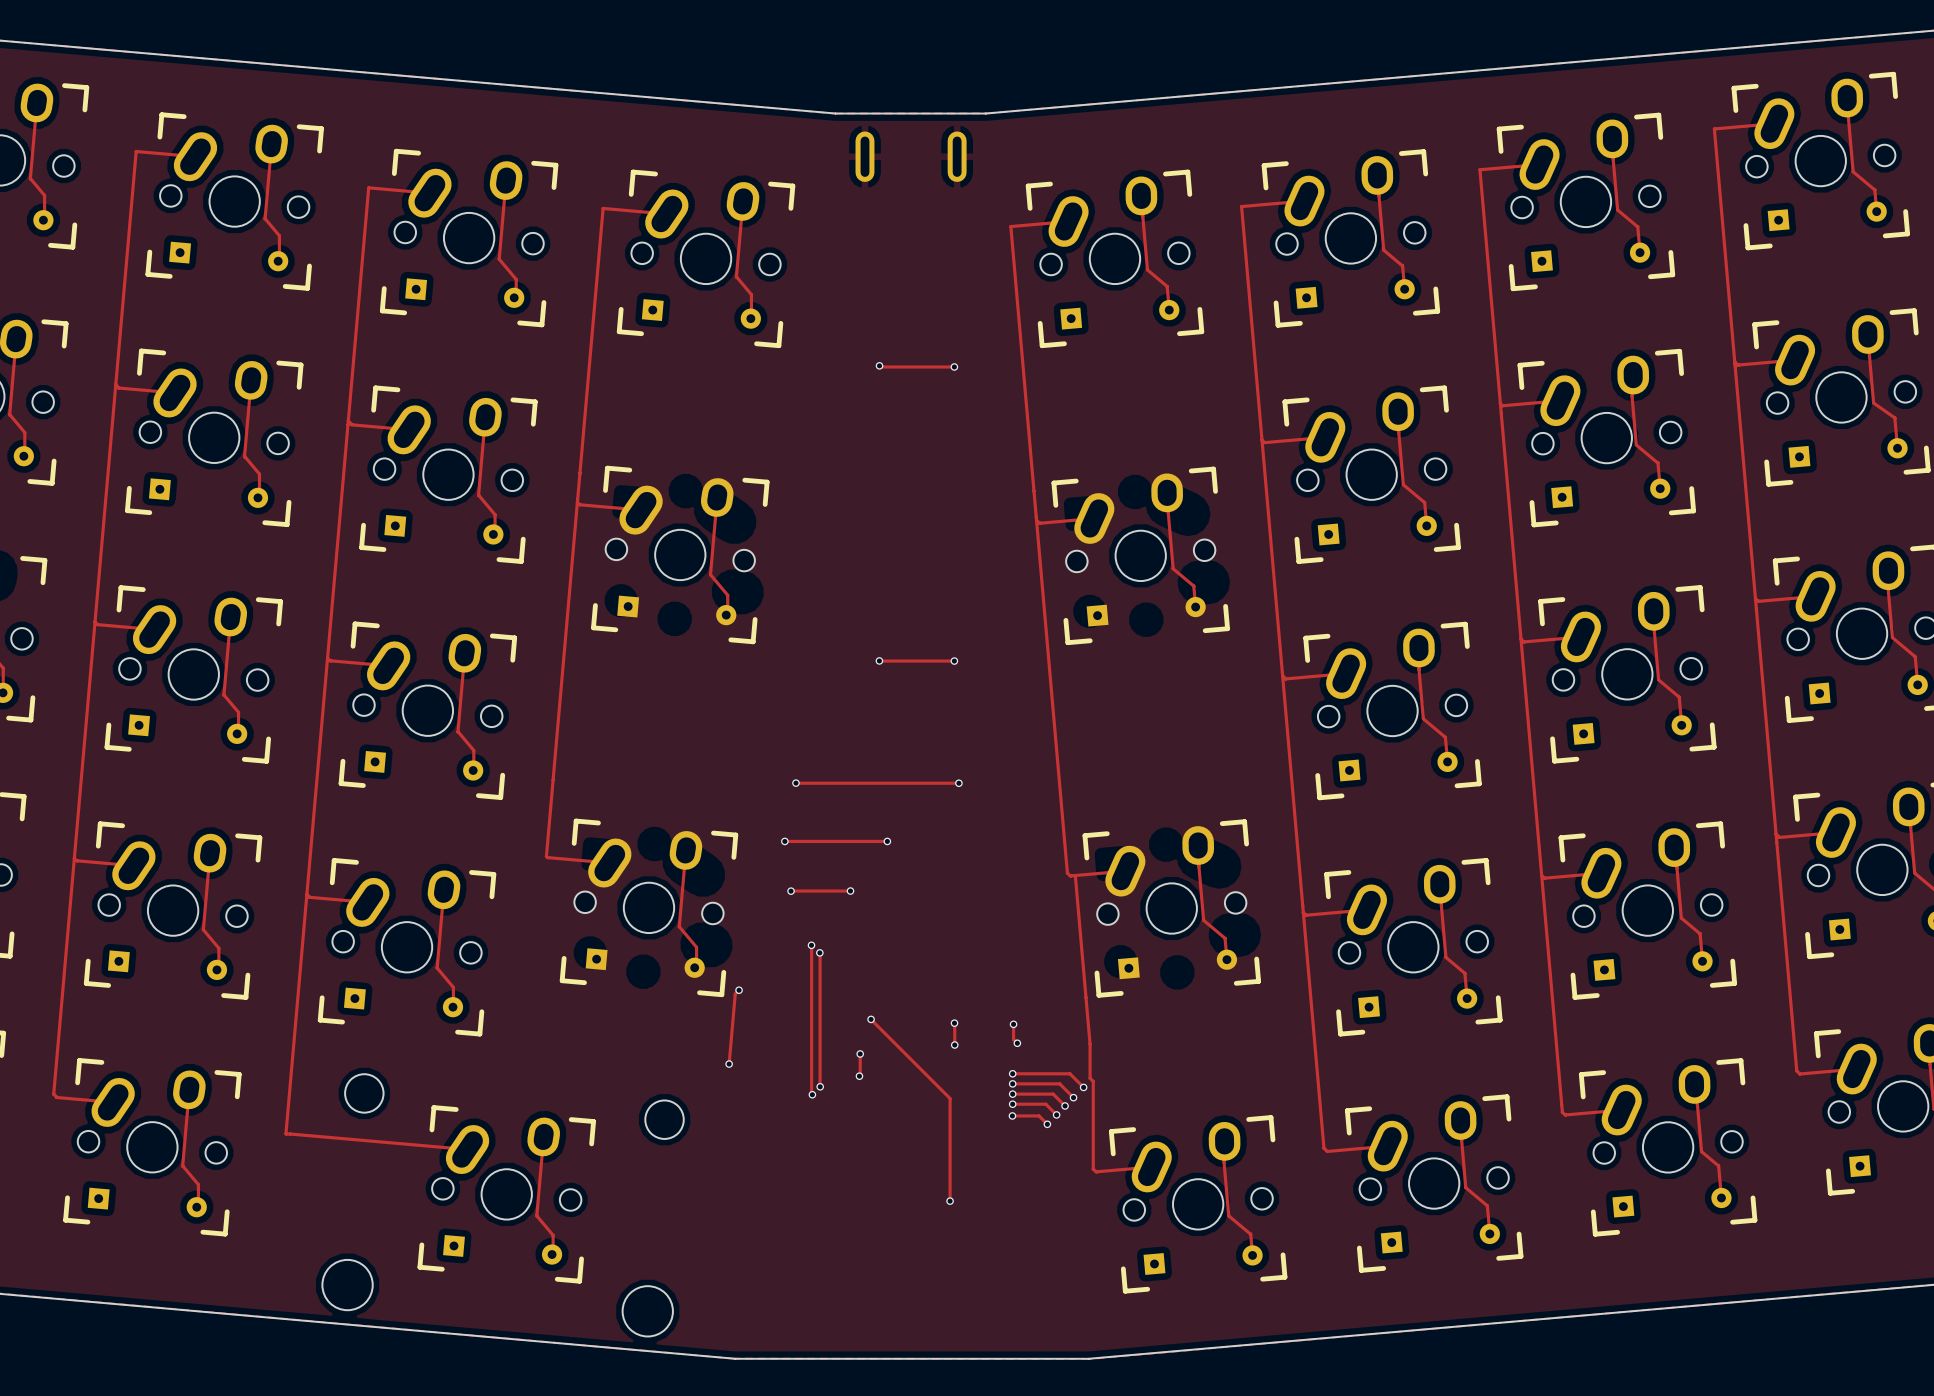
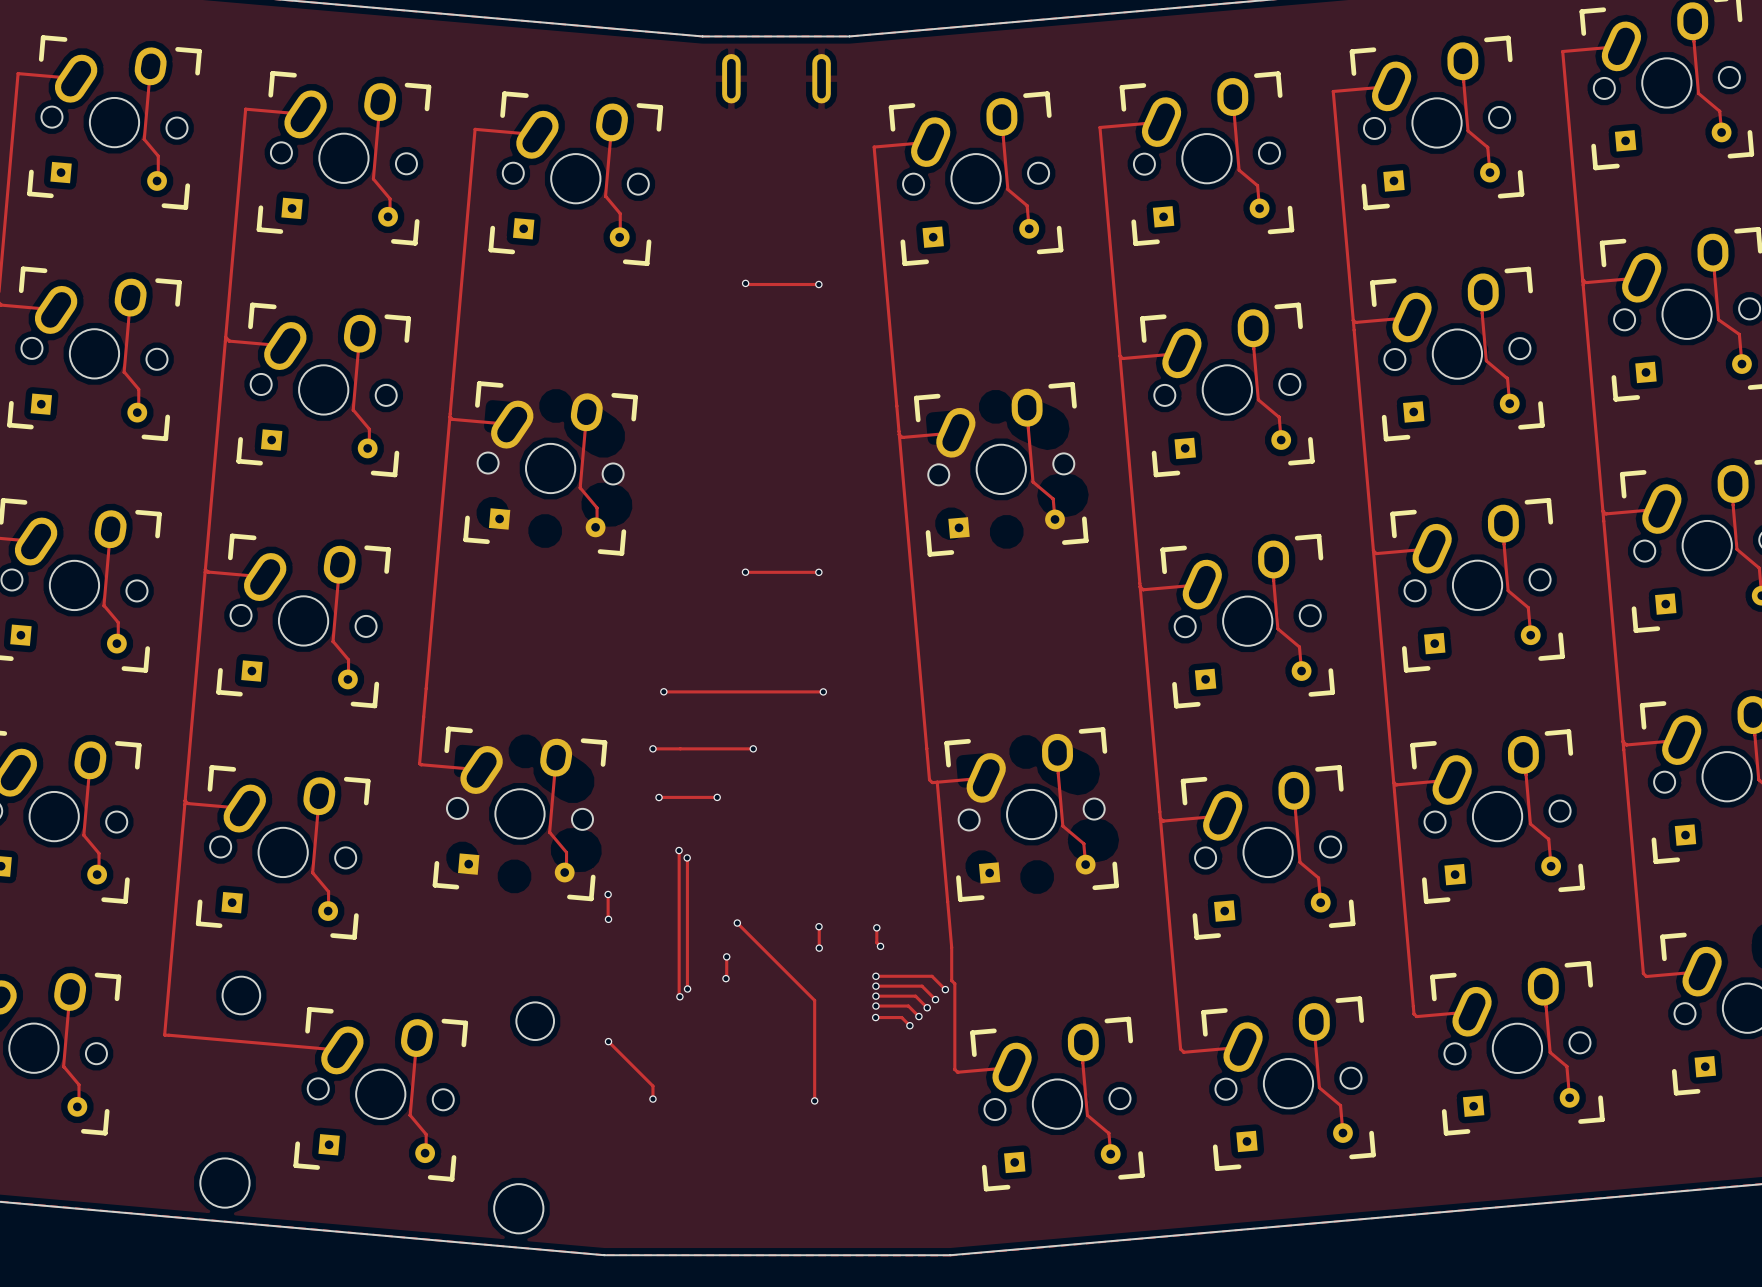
track: (739, 990) (735, 994) (729, 1064) -> (608, 894) (608, 919)
via: none -> (608, 919)
via: (729, 1064) -> none
track: none -> (608, 1041) (652, 1086) (652, 1099)
via: none -> (608, 1041)
via: none -> (652, 1099)

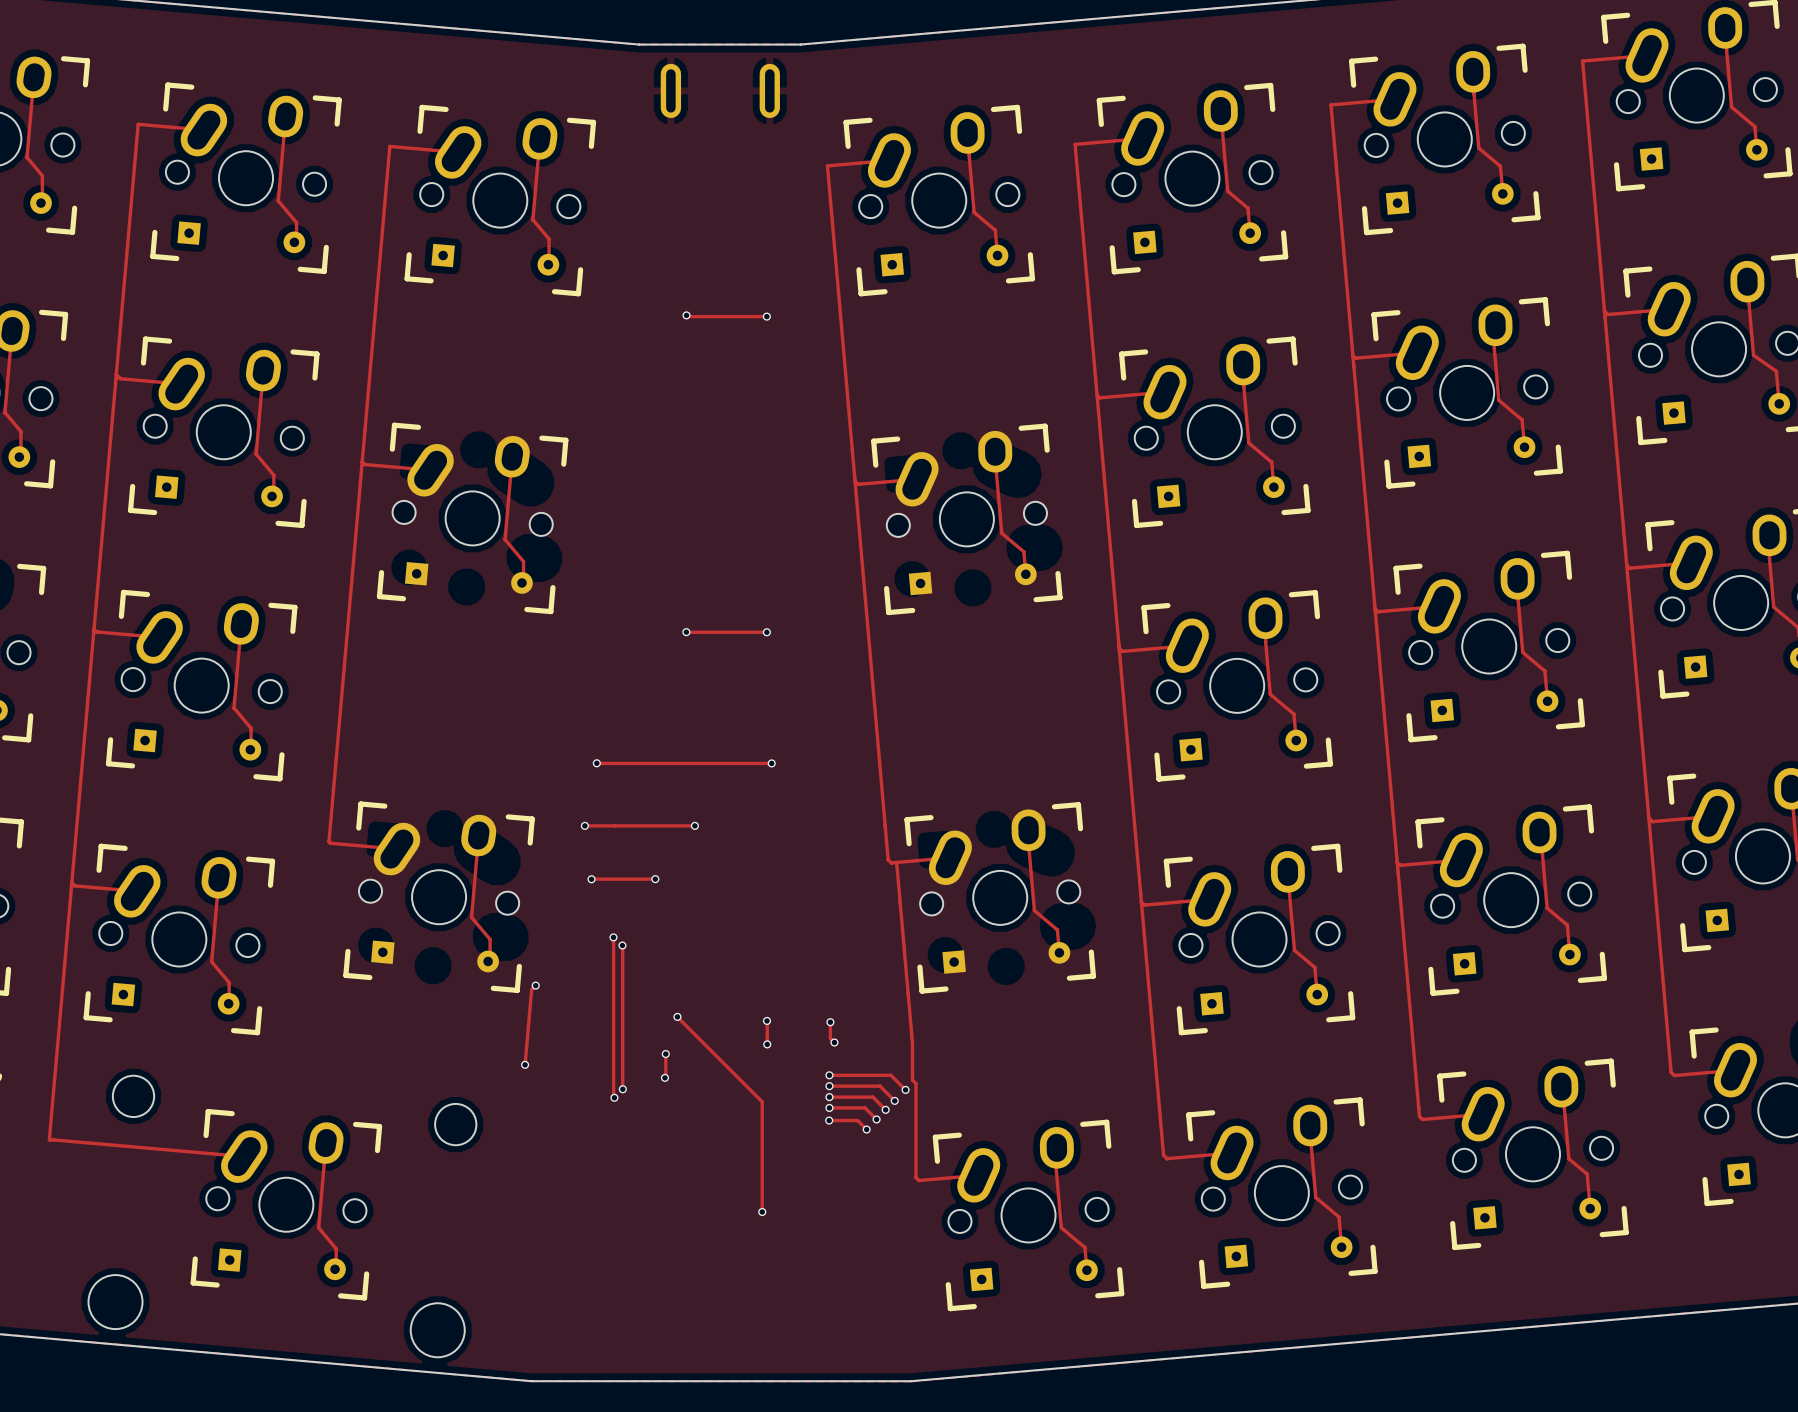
track: (608, 894) (608, 919) -> (535, 985) (531, 989) (525, 1064)
via: (608, 919) -> none
via: none -> (525, 1064)
track: (608, 1041) (652, 1086) (652, 1099) -> none
via: (608, 1041) -> none
via: (652, 1099) -> none

